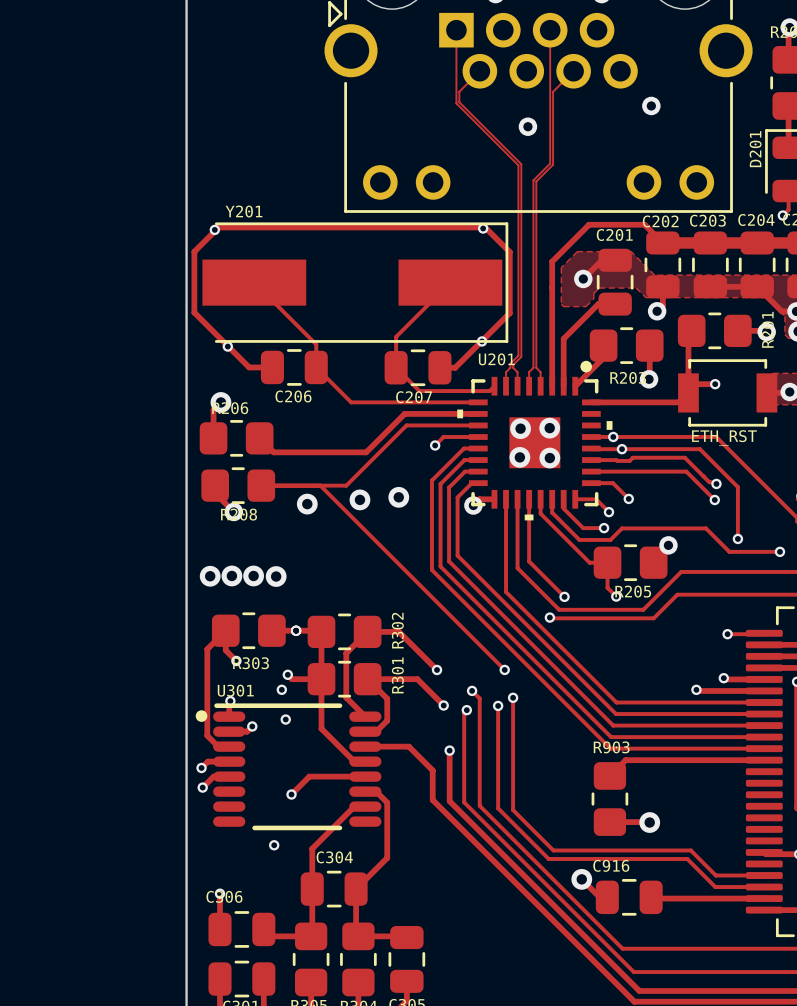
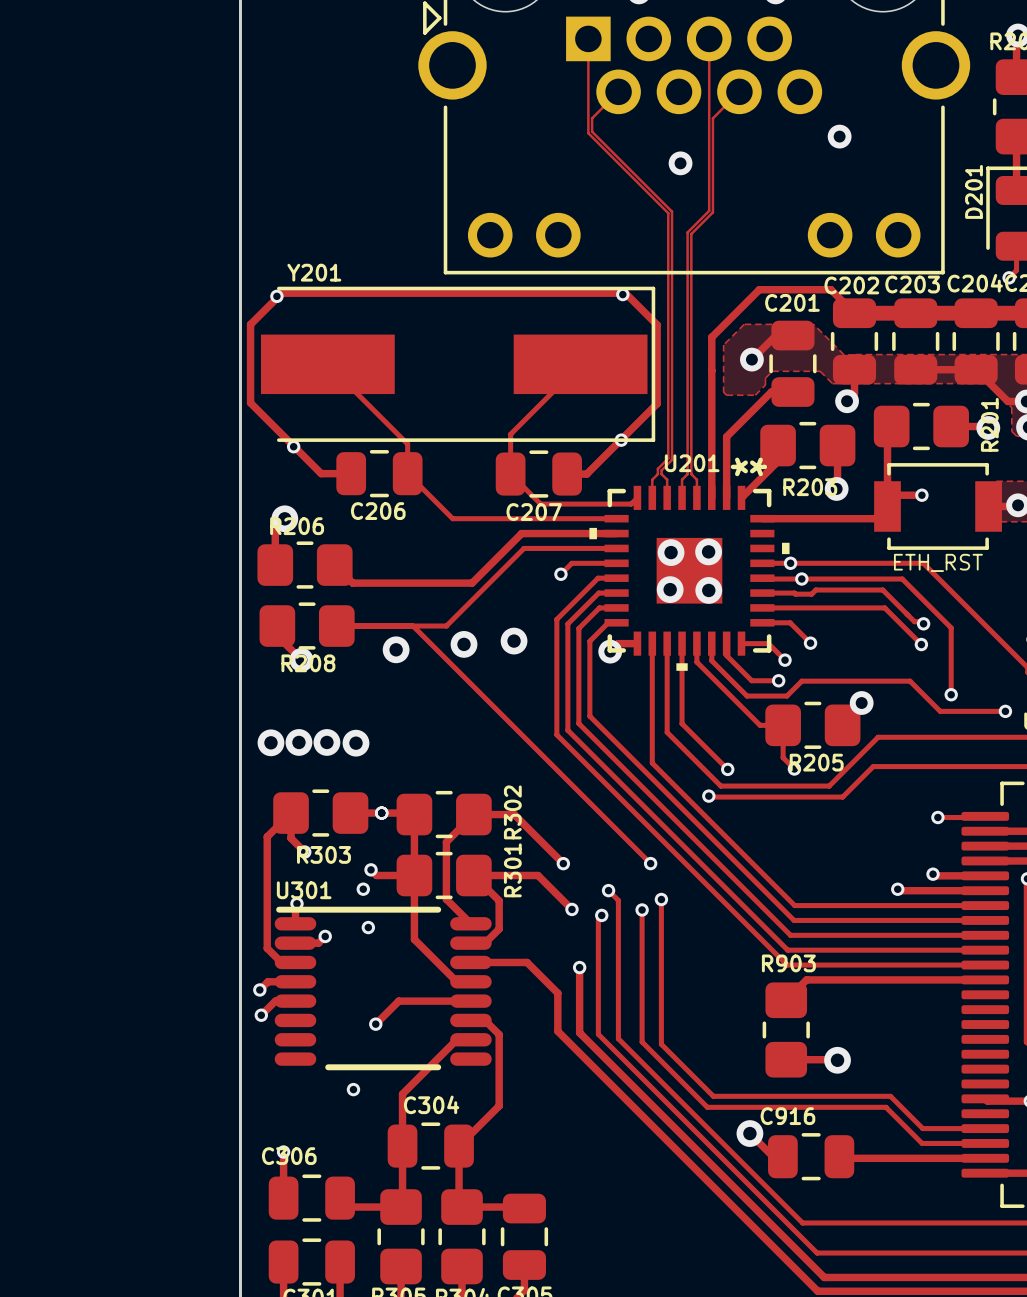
drawing: [580, 360, 593, 373] -> none
U201 footprint: [457, 376, 613, 521] -> [589, 485, 790, 671]
drawing: [195, 710, 208, 722] -> none

